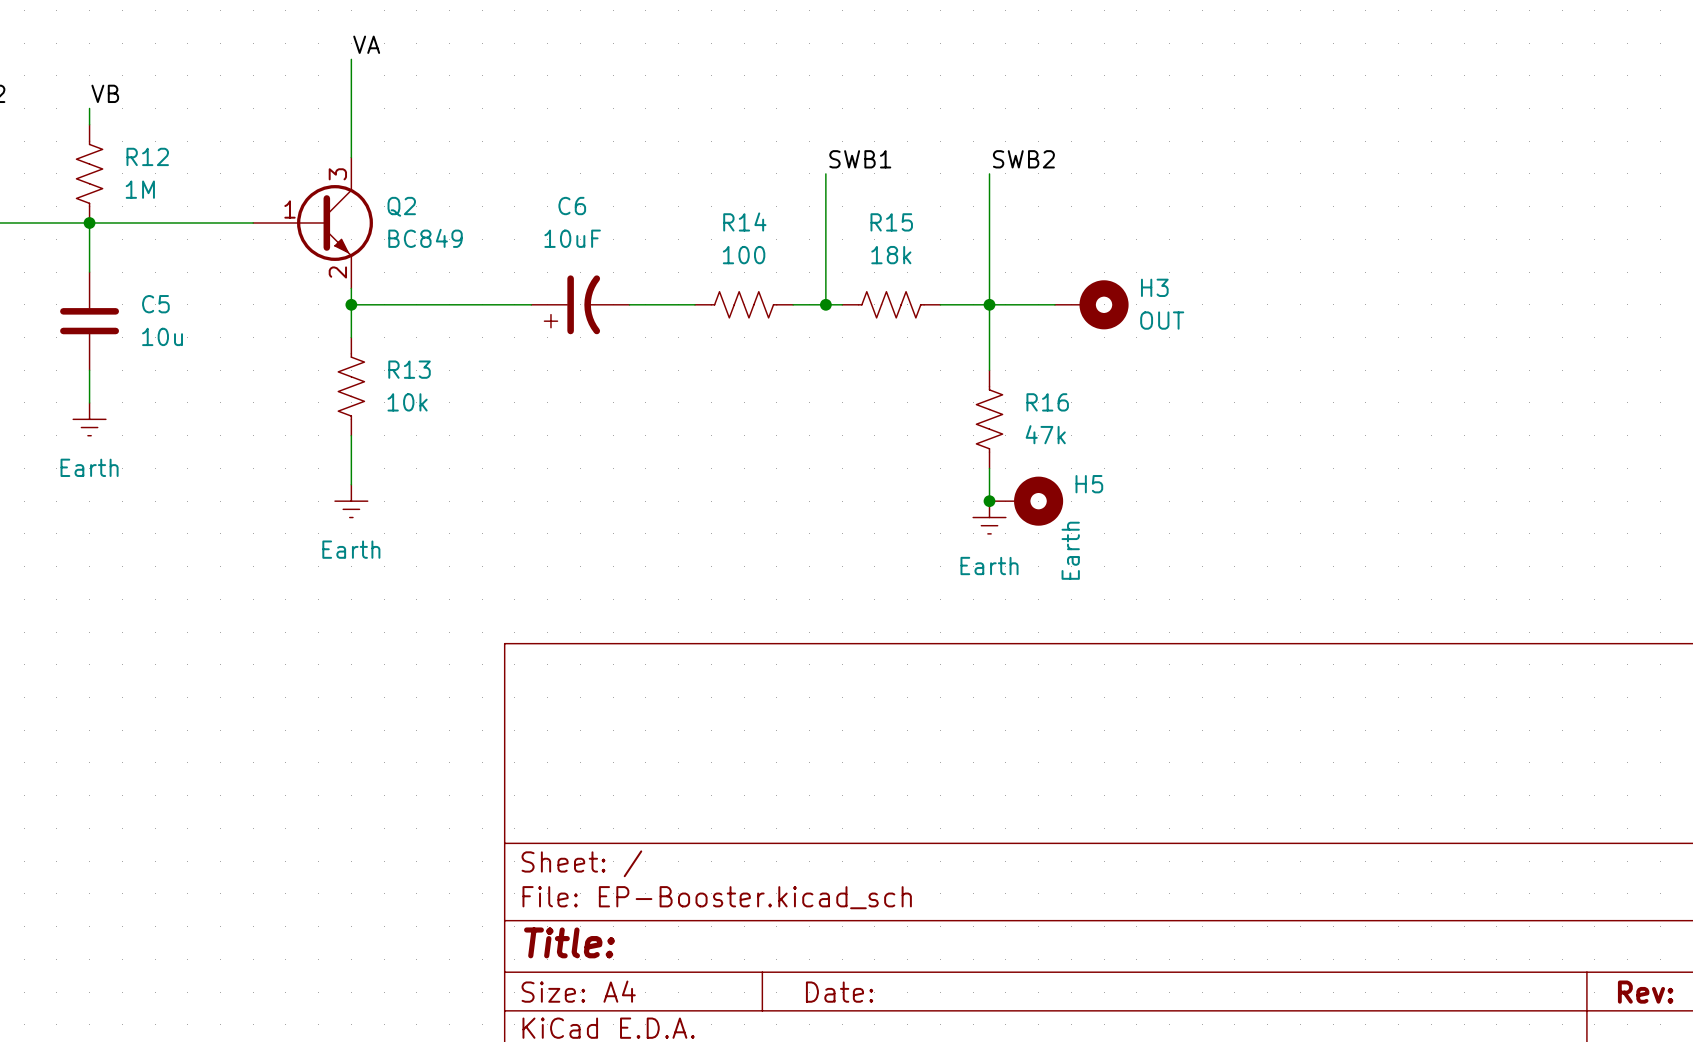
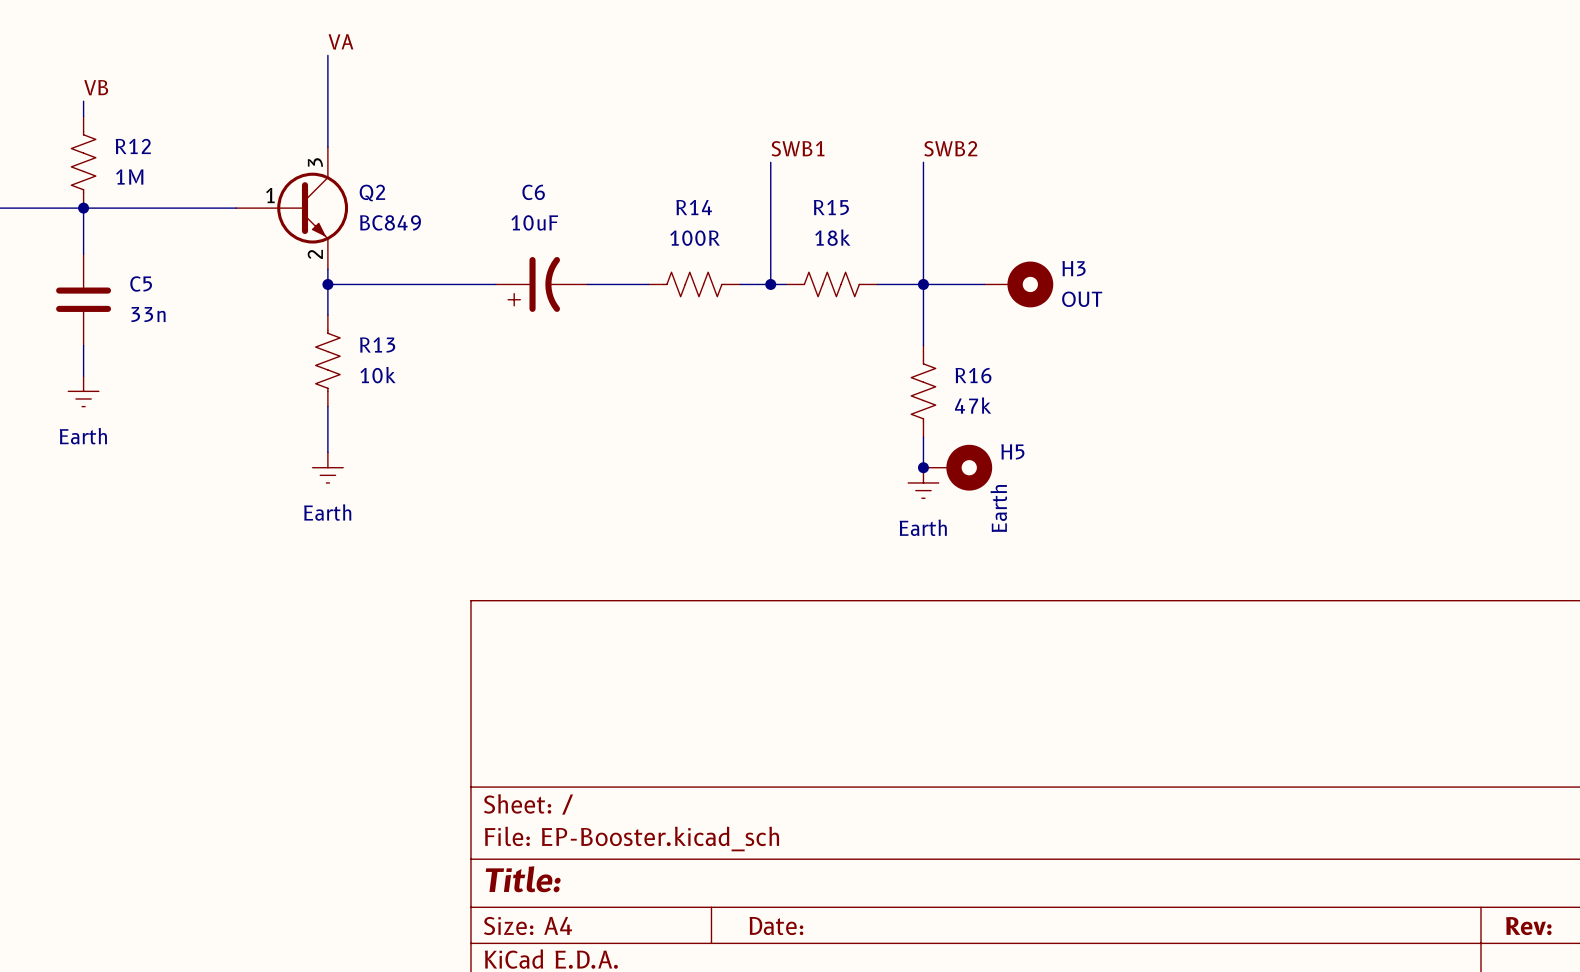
R14 value: 100 (744, 255) -> 100R (695, 238)
C5 value: 10u (162, 336) -> 33n (148, 314)

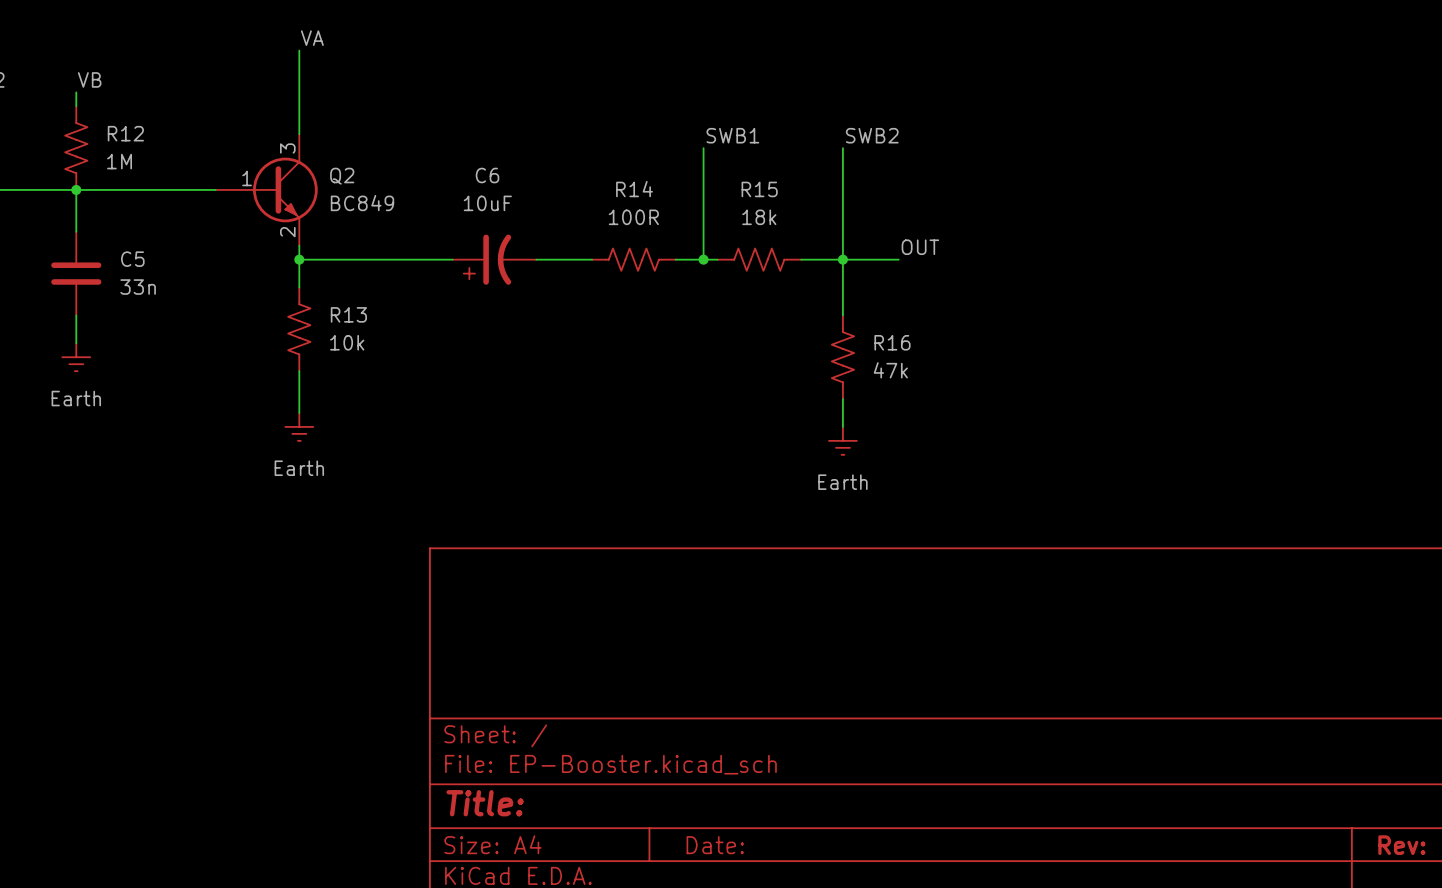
label: none -> OUT (920, 247)
H3: OUT (1018, 284) -> none
junction: (923, 467) -> none
H5: Earth (957, 467) -> none

